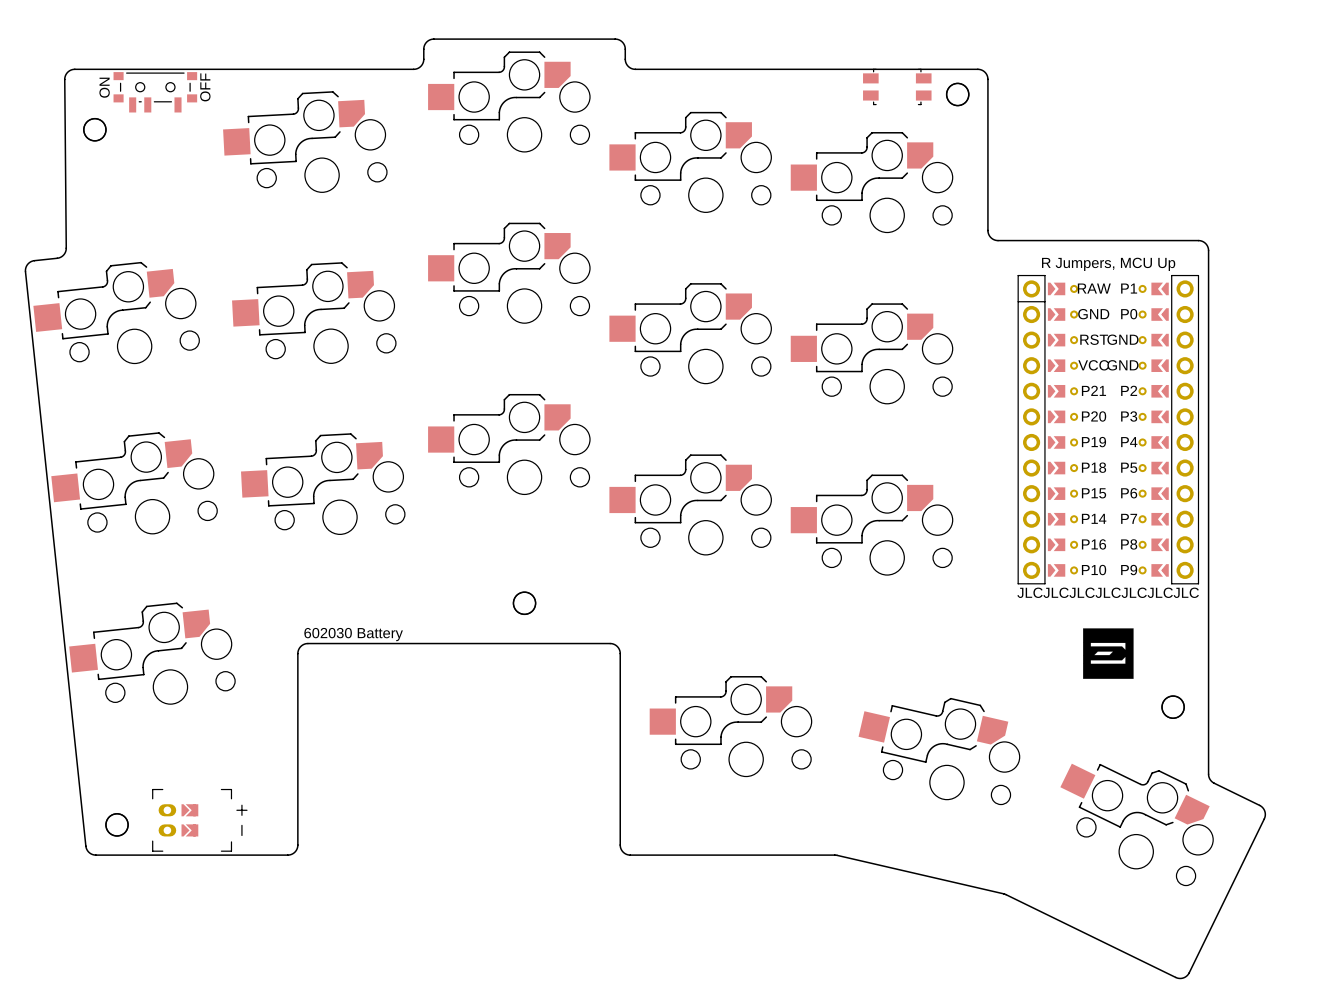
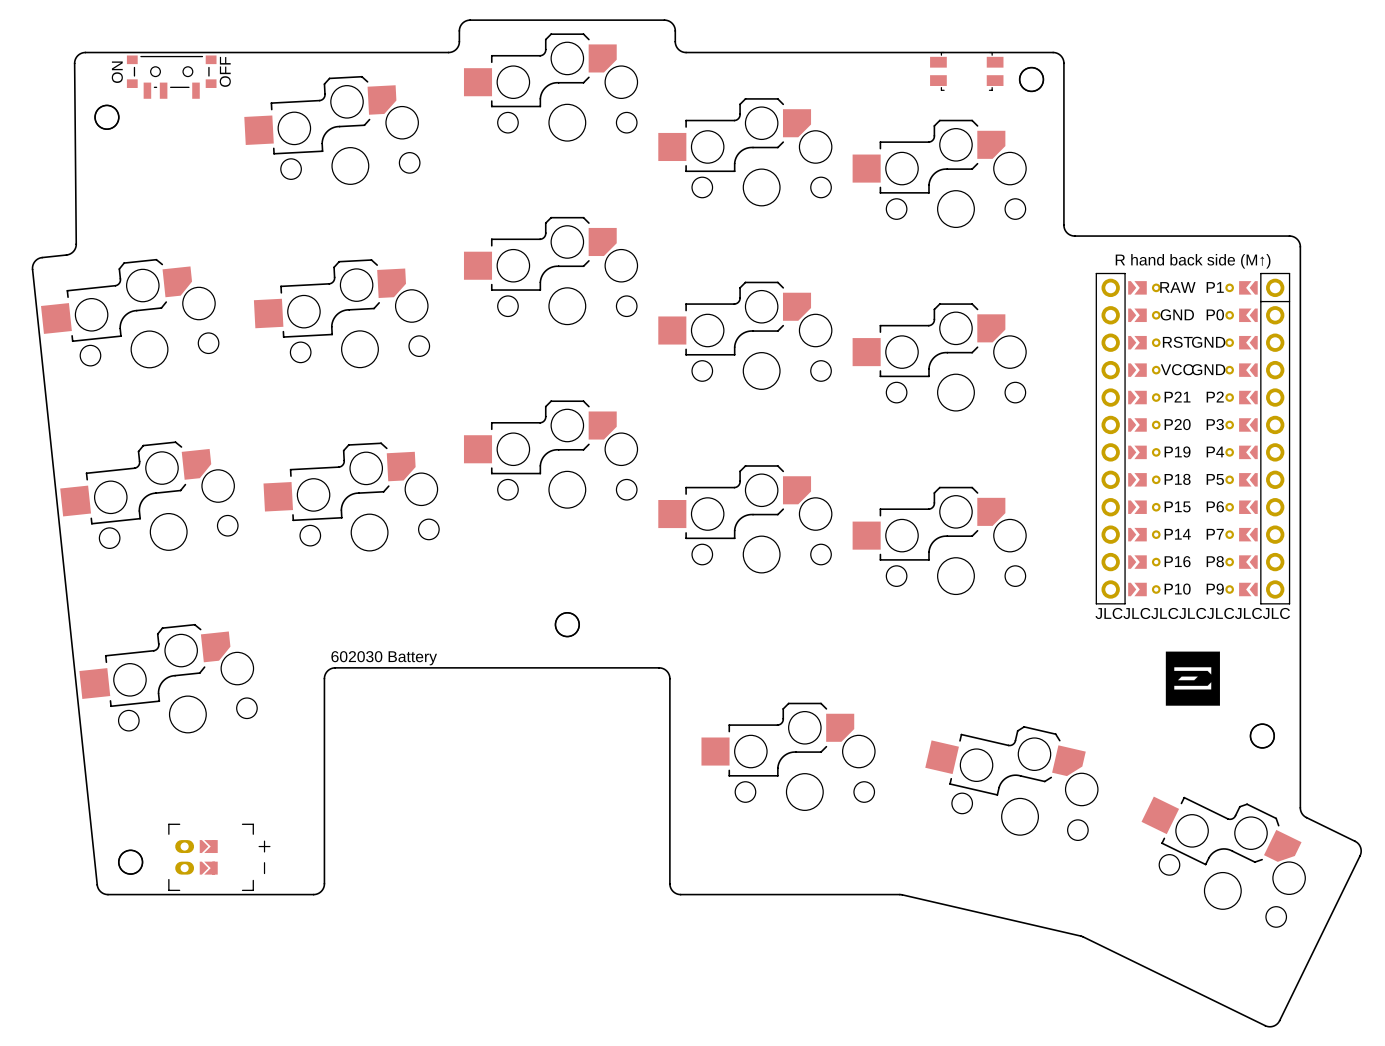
part footprint: [1017, 274, 1200, 585] -> [1095, 272, 1291, 605]

